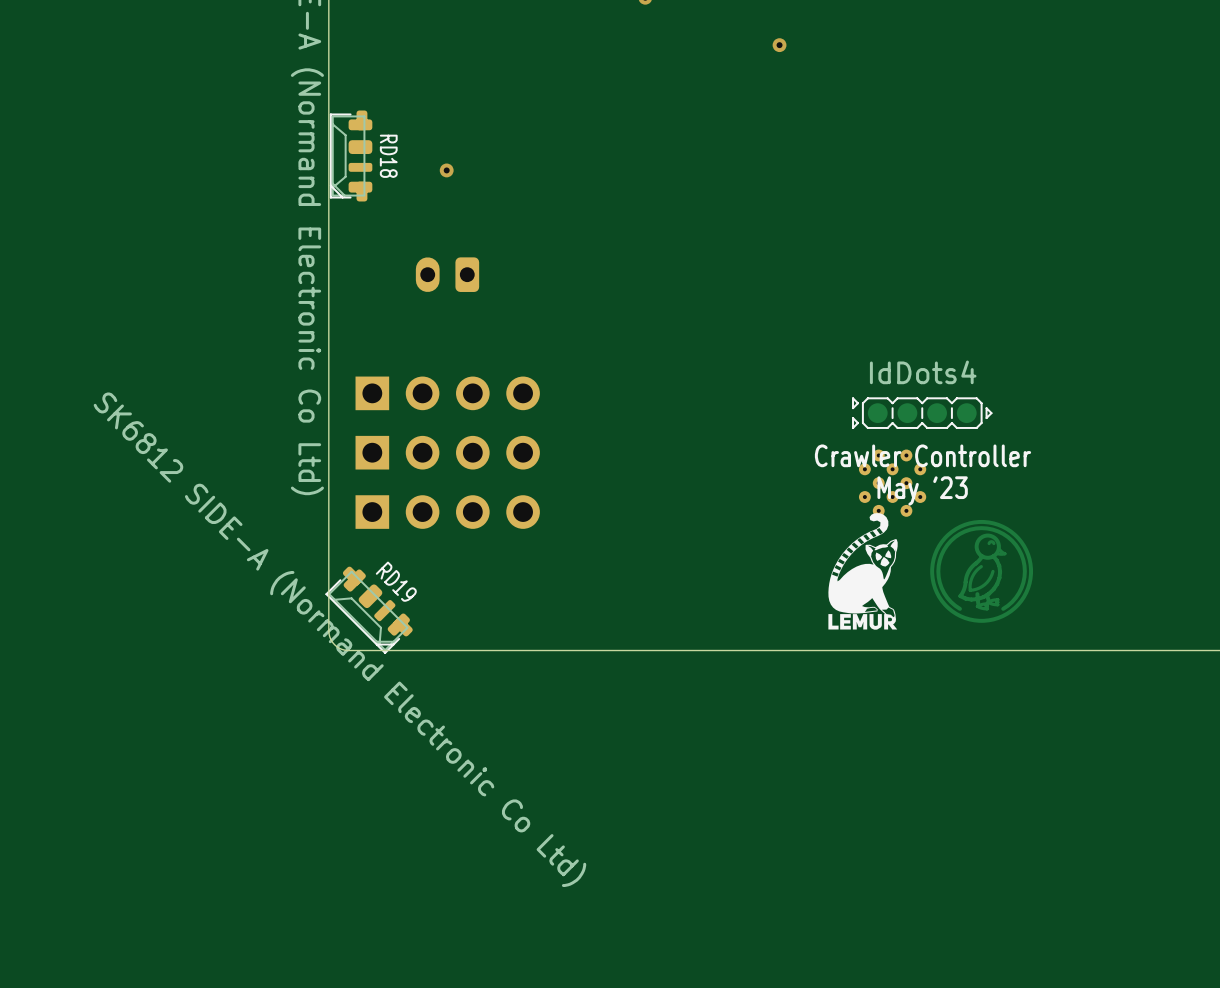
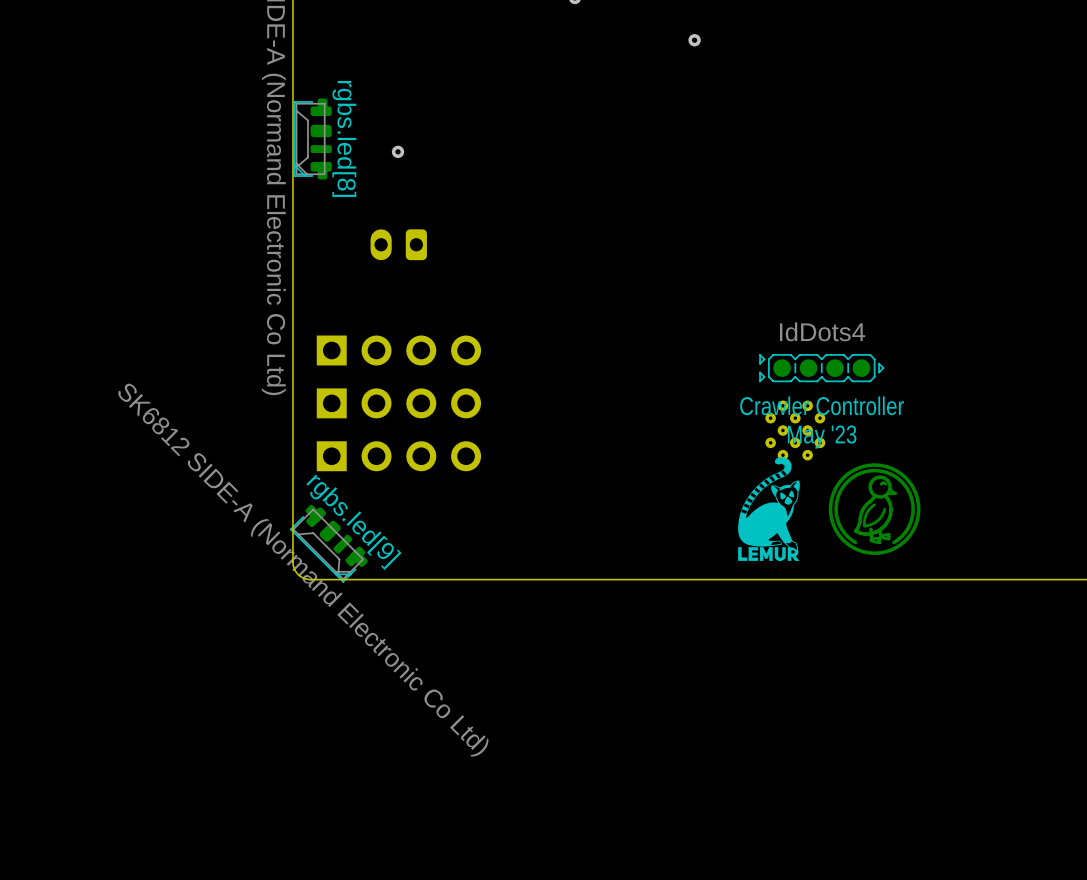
RD18 name: RD18 (388, 156) -> rgbs.led[8] (344, 138)
RD19 name: RD19 (396, 581) -> rgbs.led[9] (353, 522)

